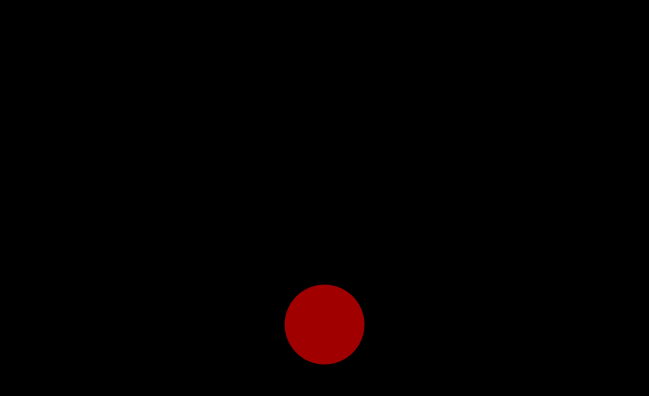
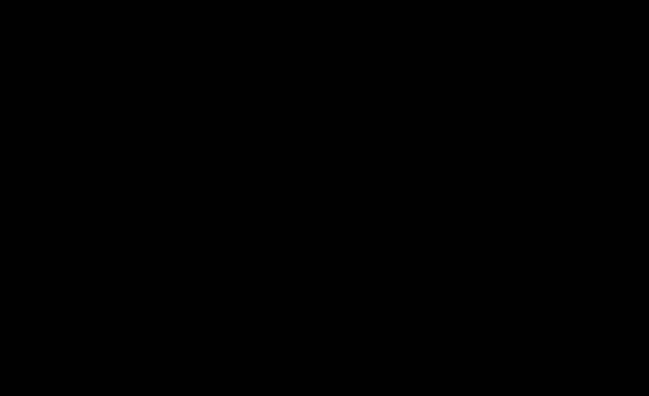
part: (324, 324) -> none

